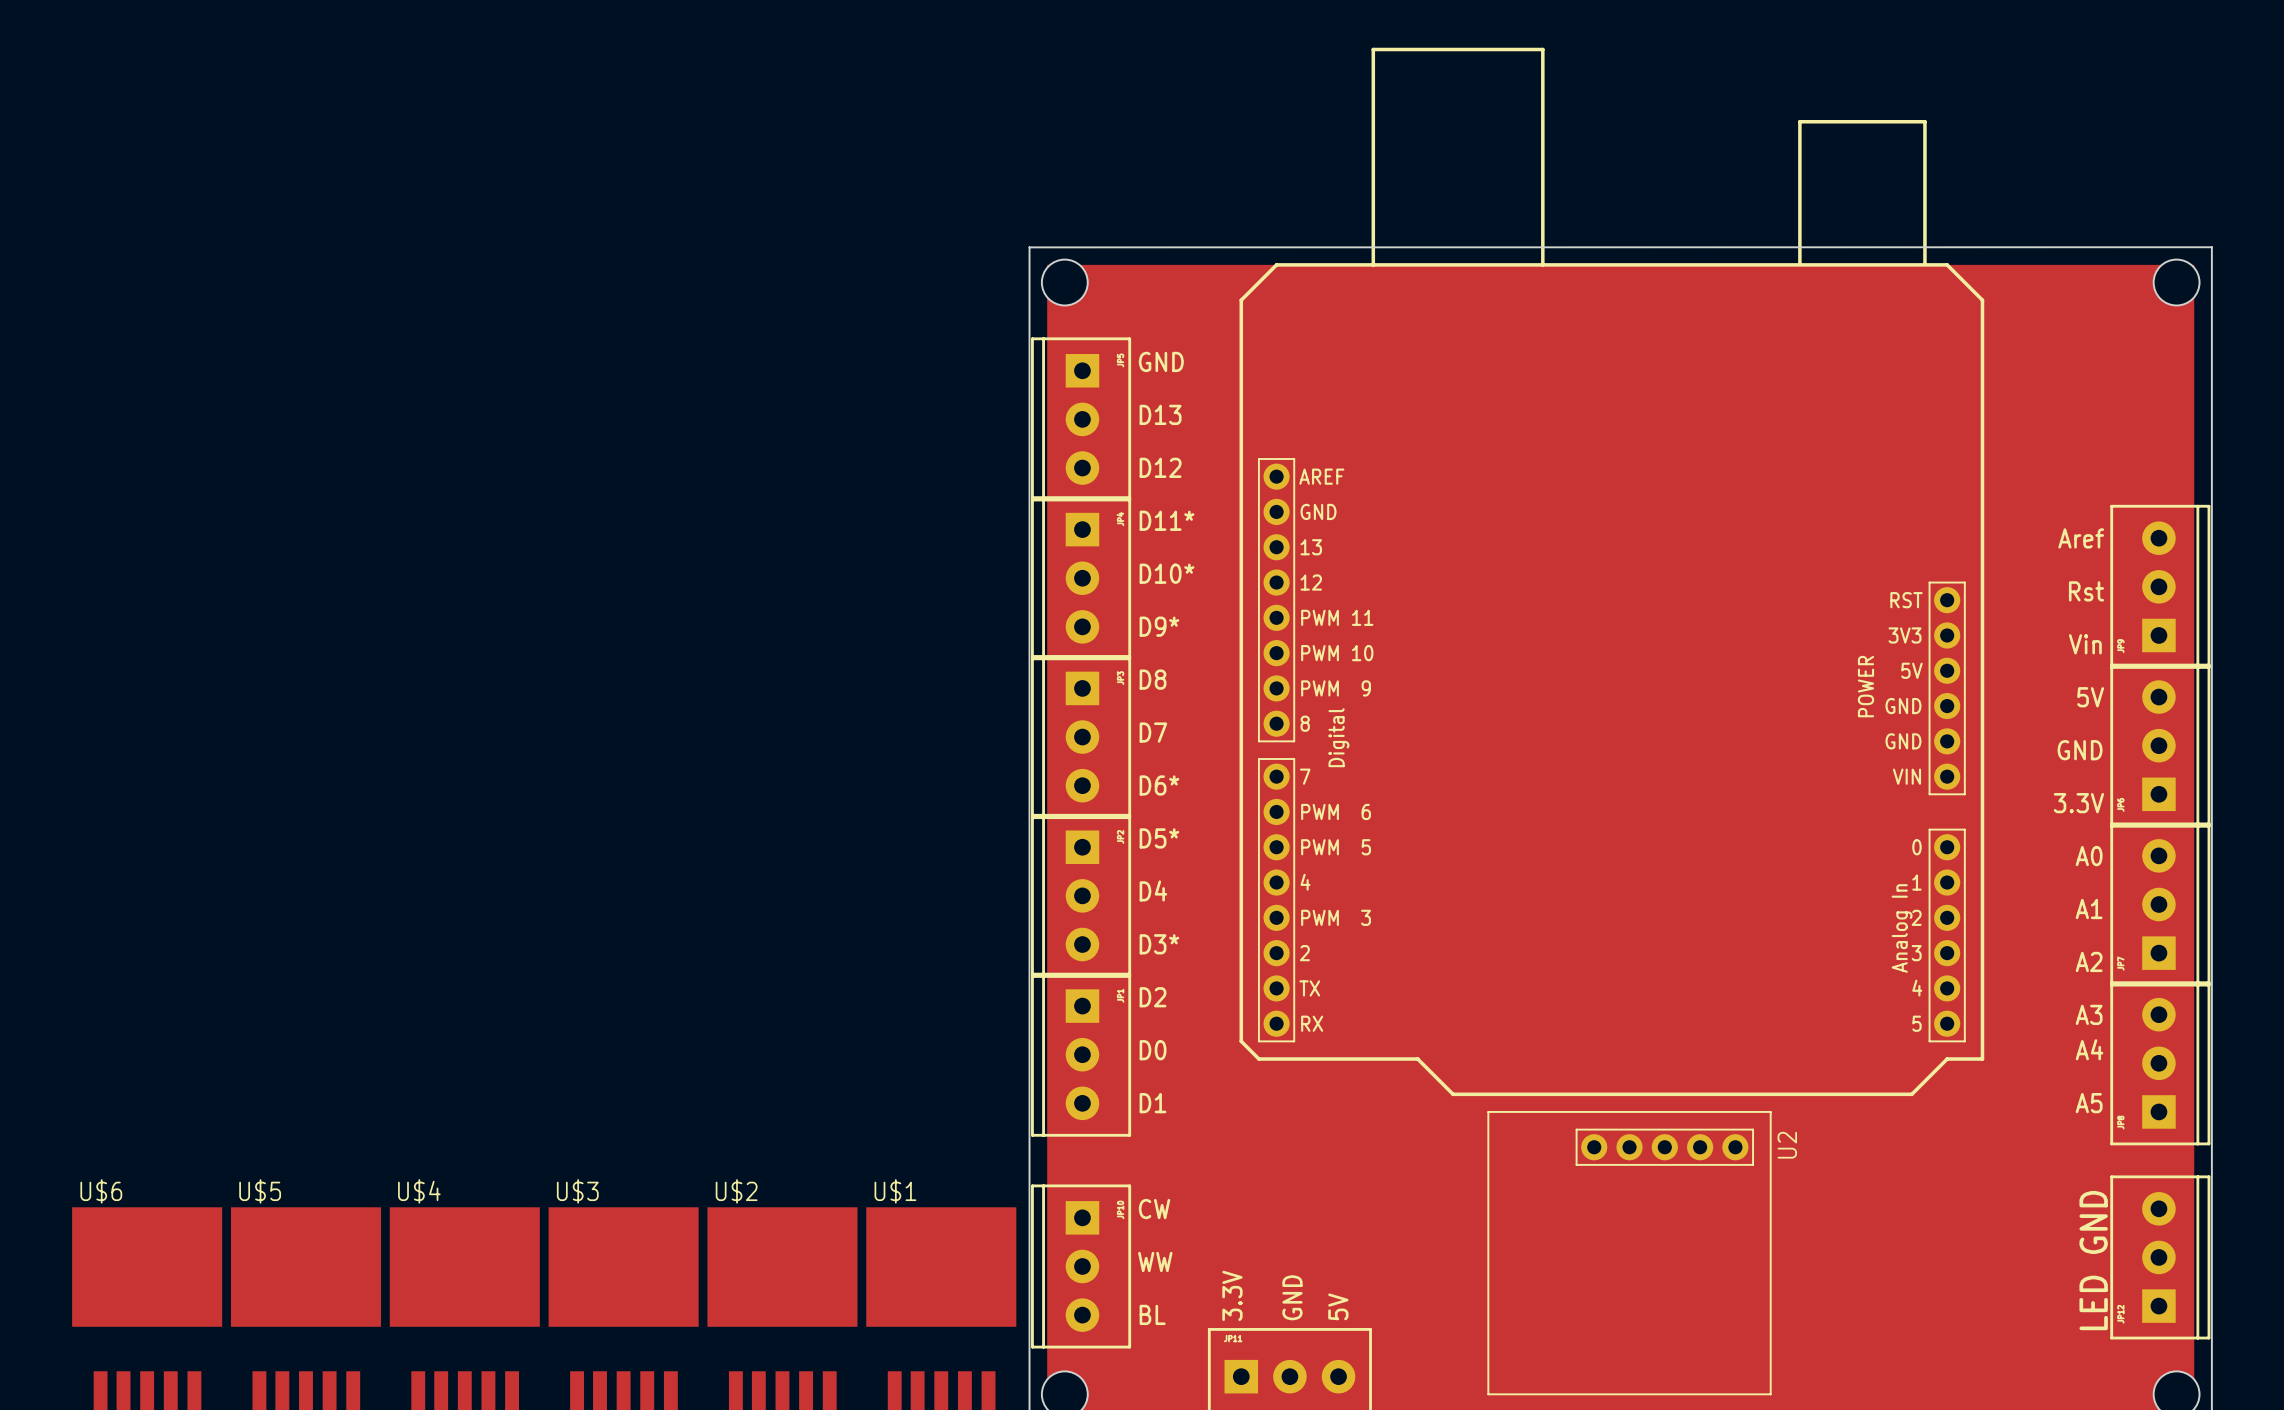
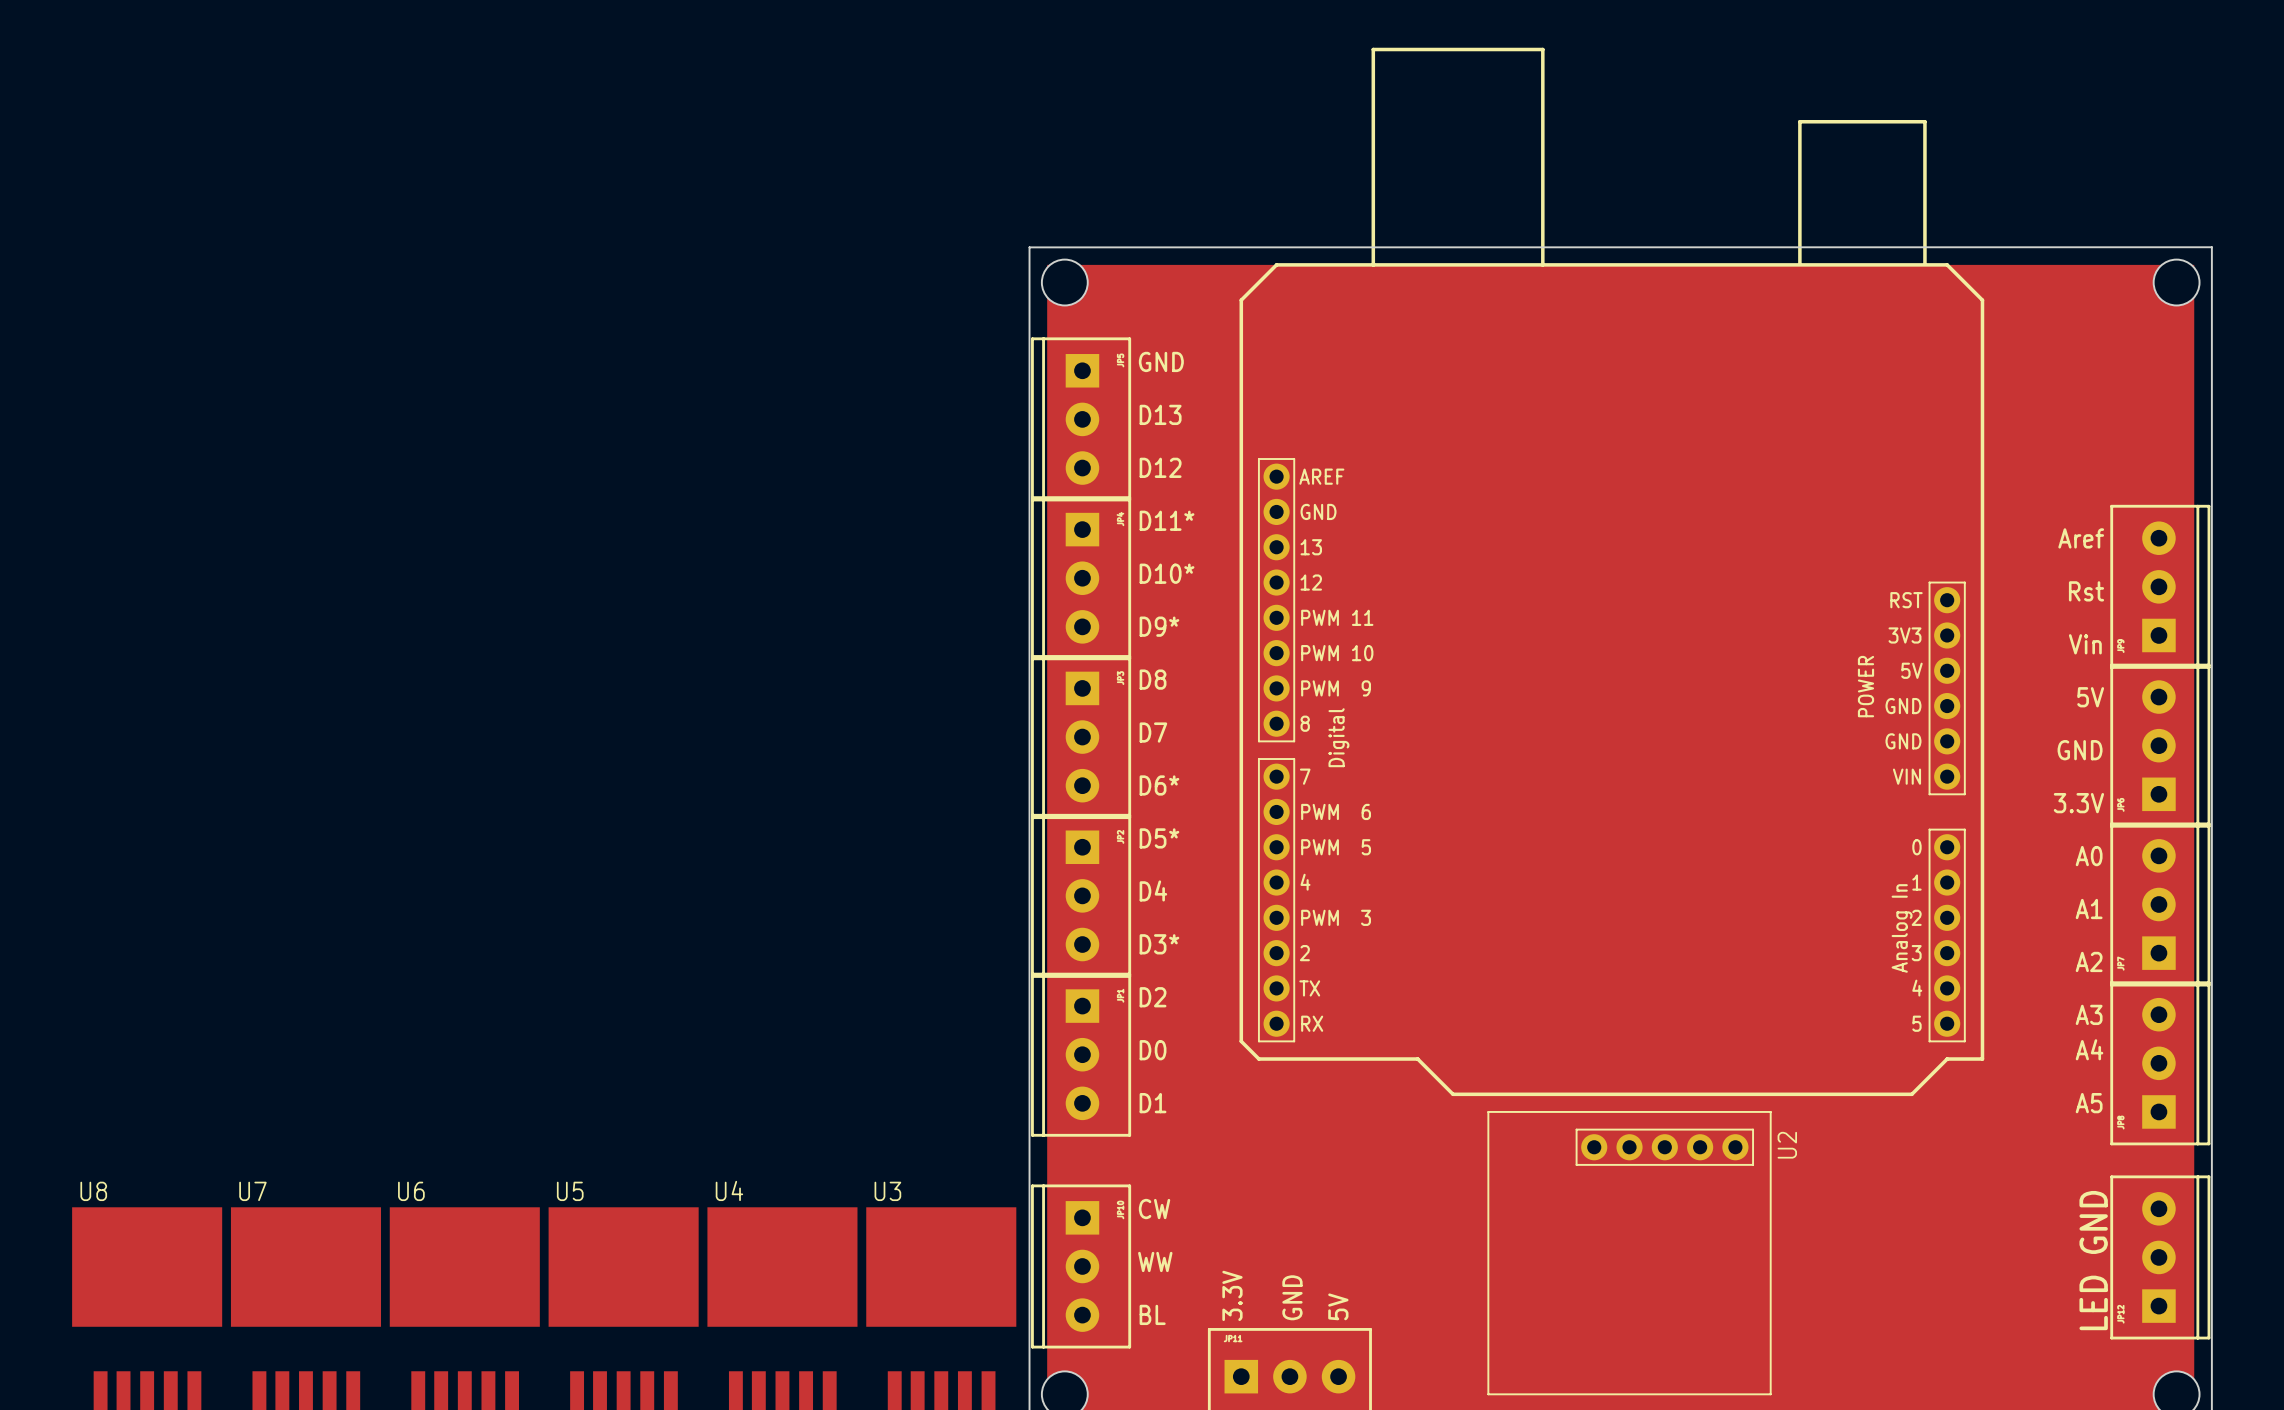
U$6 name: U$6 (101, 1191) -> U8 (93, 1191)
U$5 name: U$5 (260, 1191) -> U7 (252, 1191)
U$4 name: U$4 (419, 1191) -> U6 (411, 1191)
U$3 name: U$3 (577, 1191) -> U5 (570, 1191)
U$2 name: U$2 (736, 1191) -> U4 (729, 1190)
U$1 name: U$1 (895, 1191) -> U3 (887, 1191)

